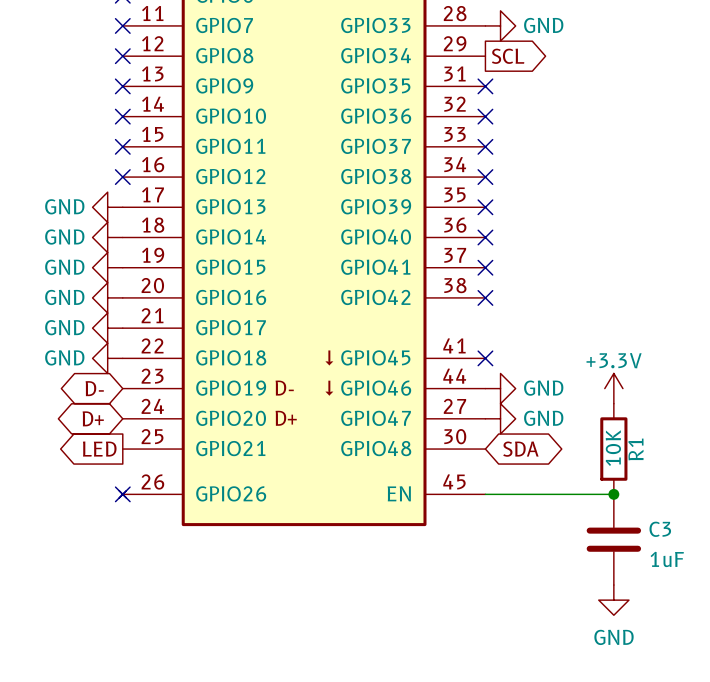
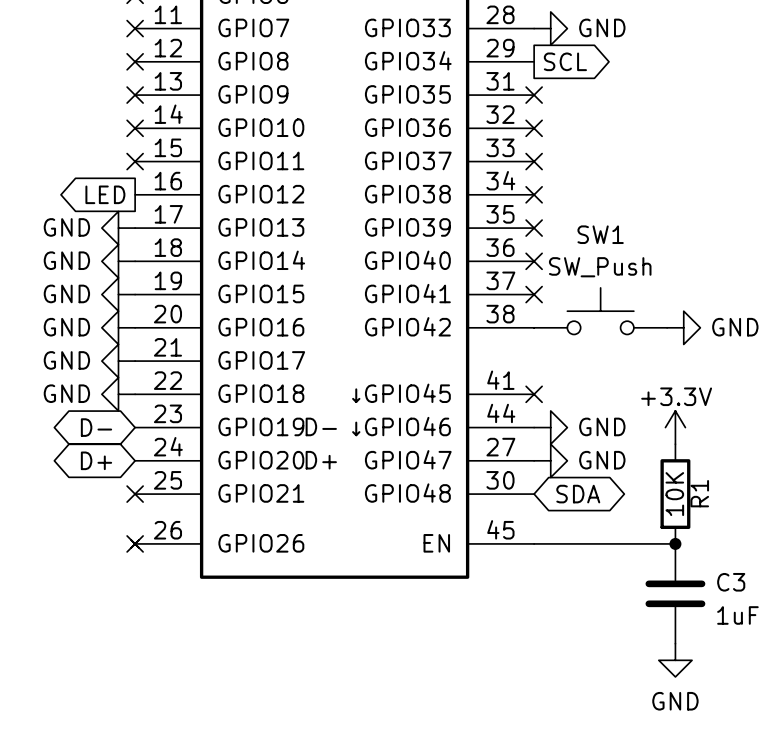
no-connect mark: (122, 177) -> none
SW1: none -> SW_Push (600, 311)
no-connect mark: (485, 297) -> none
power symbol: none -> GND (683, 327)
global label position: LED (99, 449) -> LED (105, 194)
no-connect mark: none -> (135, 494)

